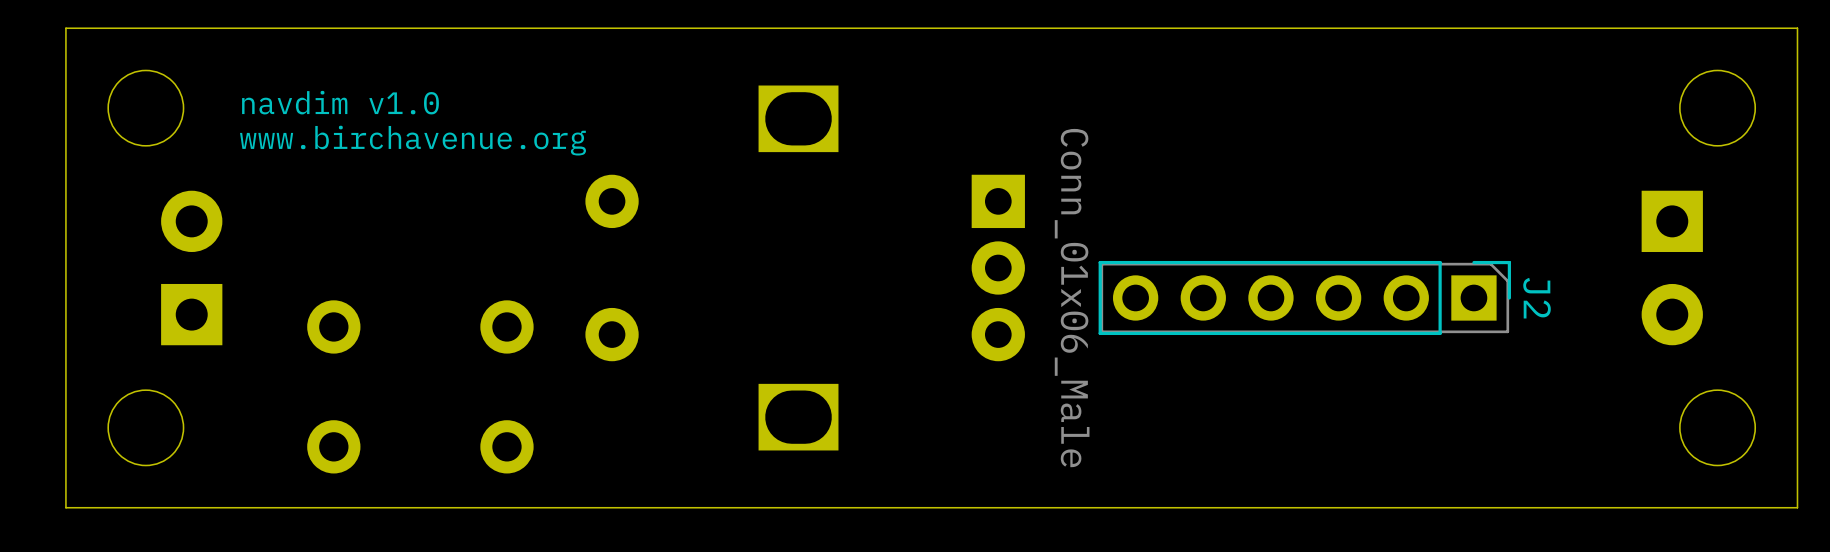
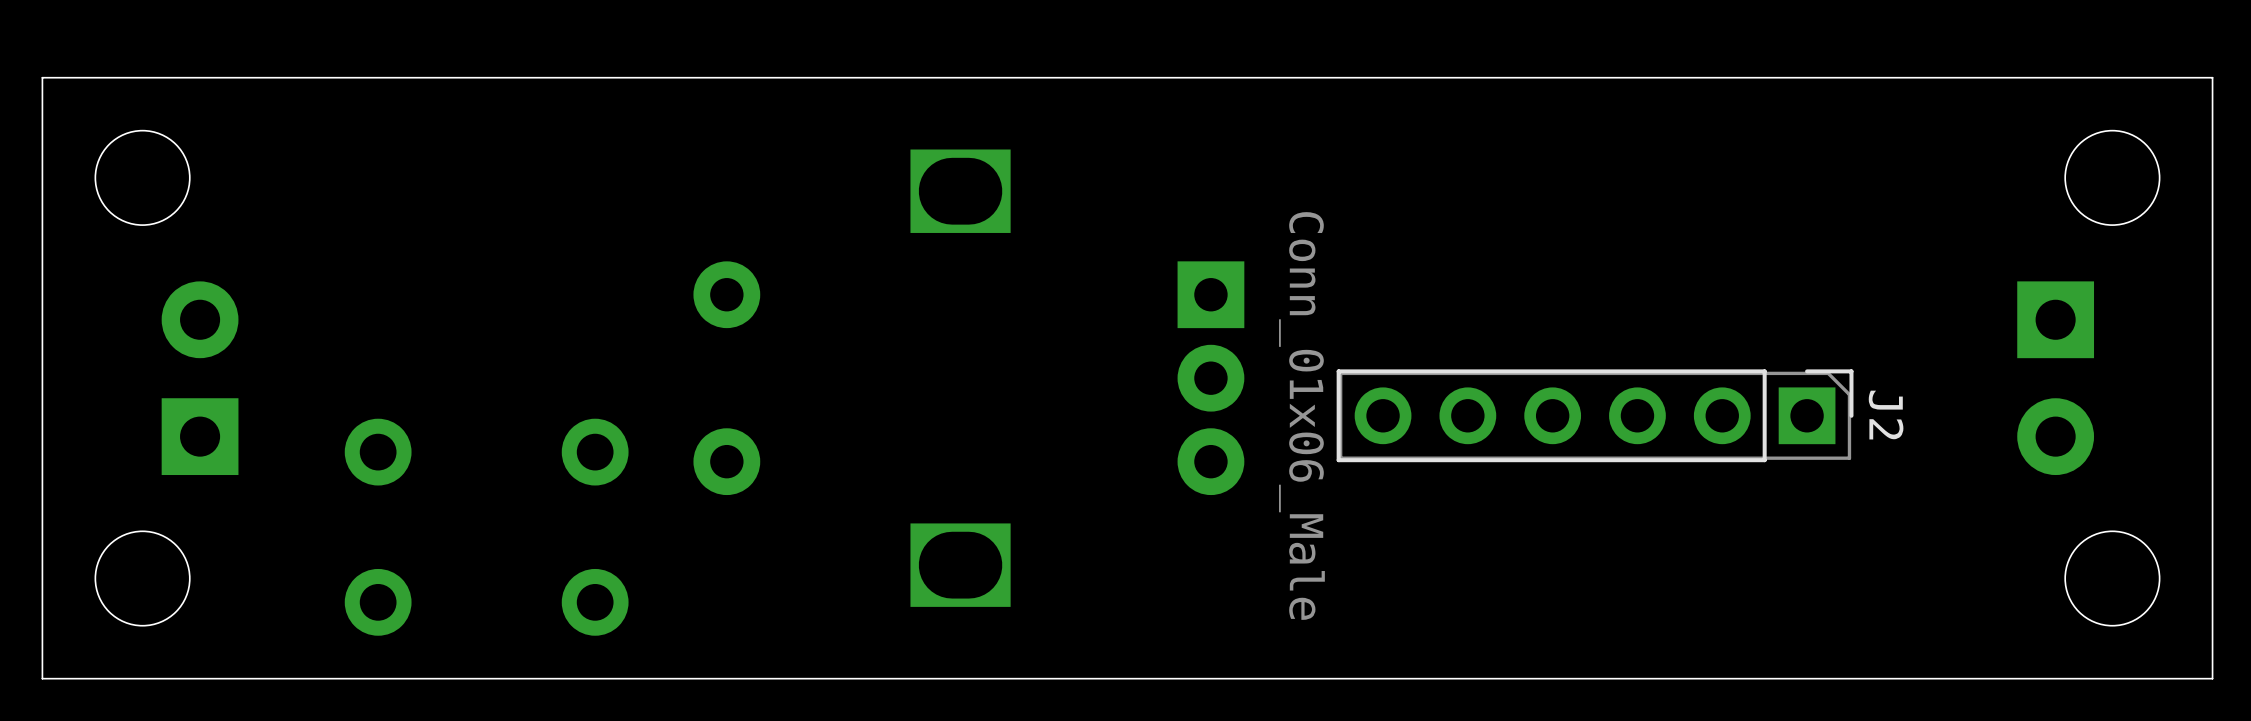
text: navdim v1.0 (340, 102) -> none
text: www.birchavenue.org (413, 140) -> none

